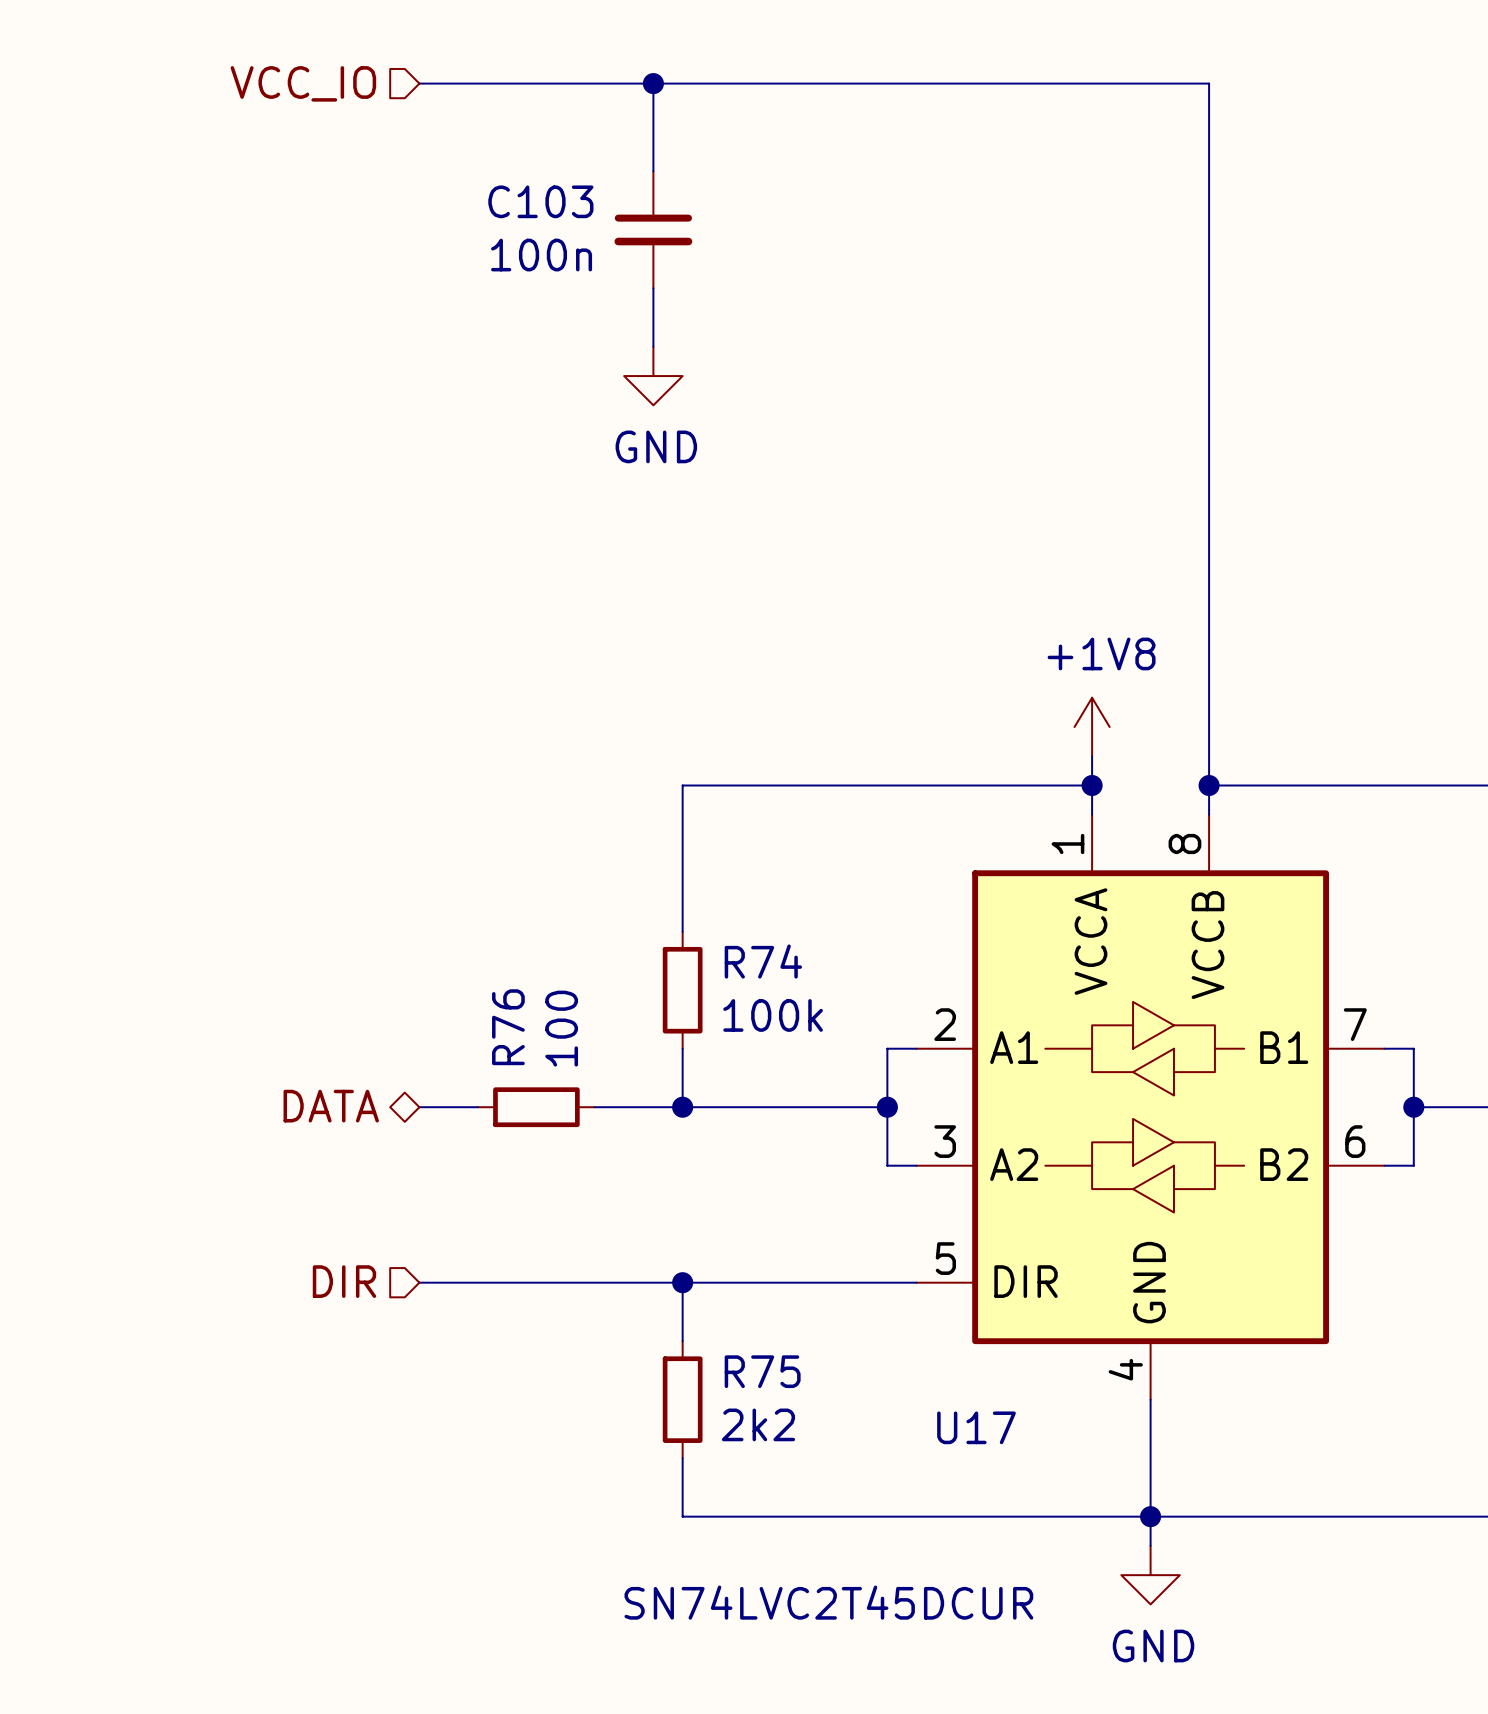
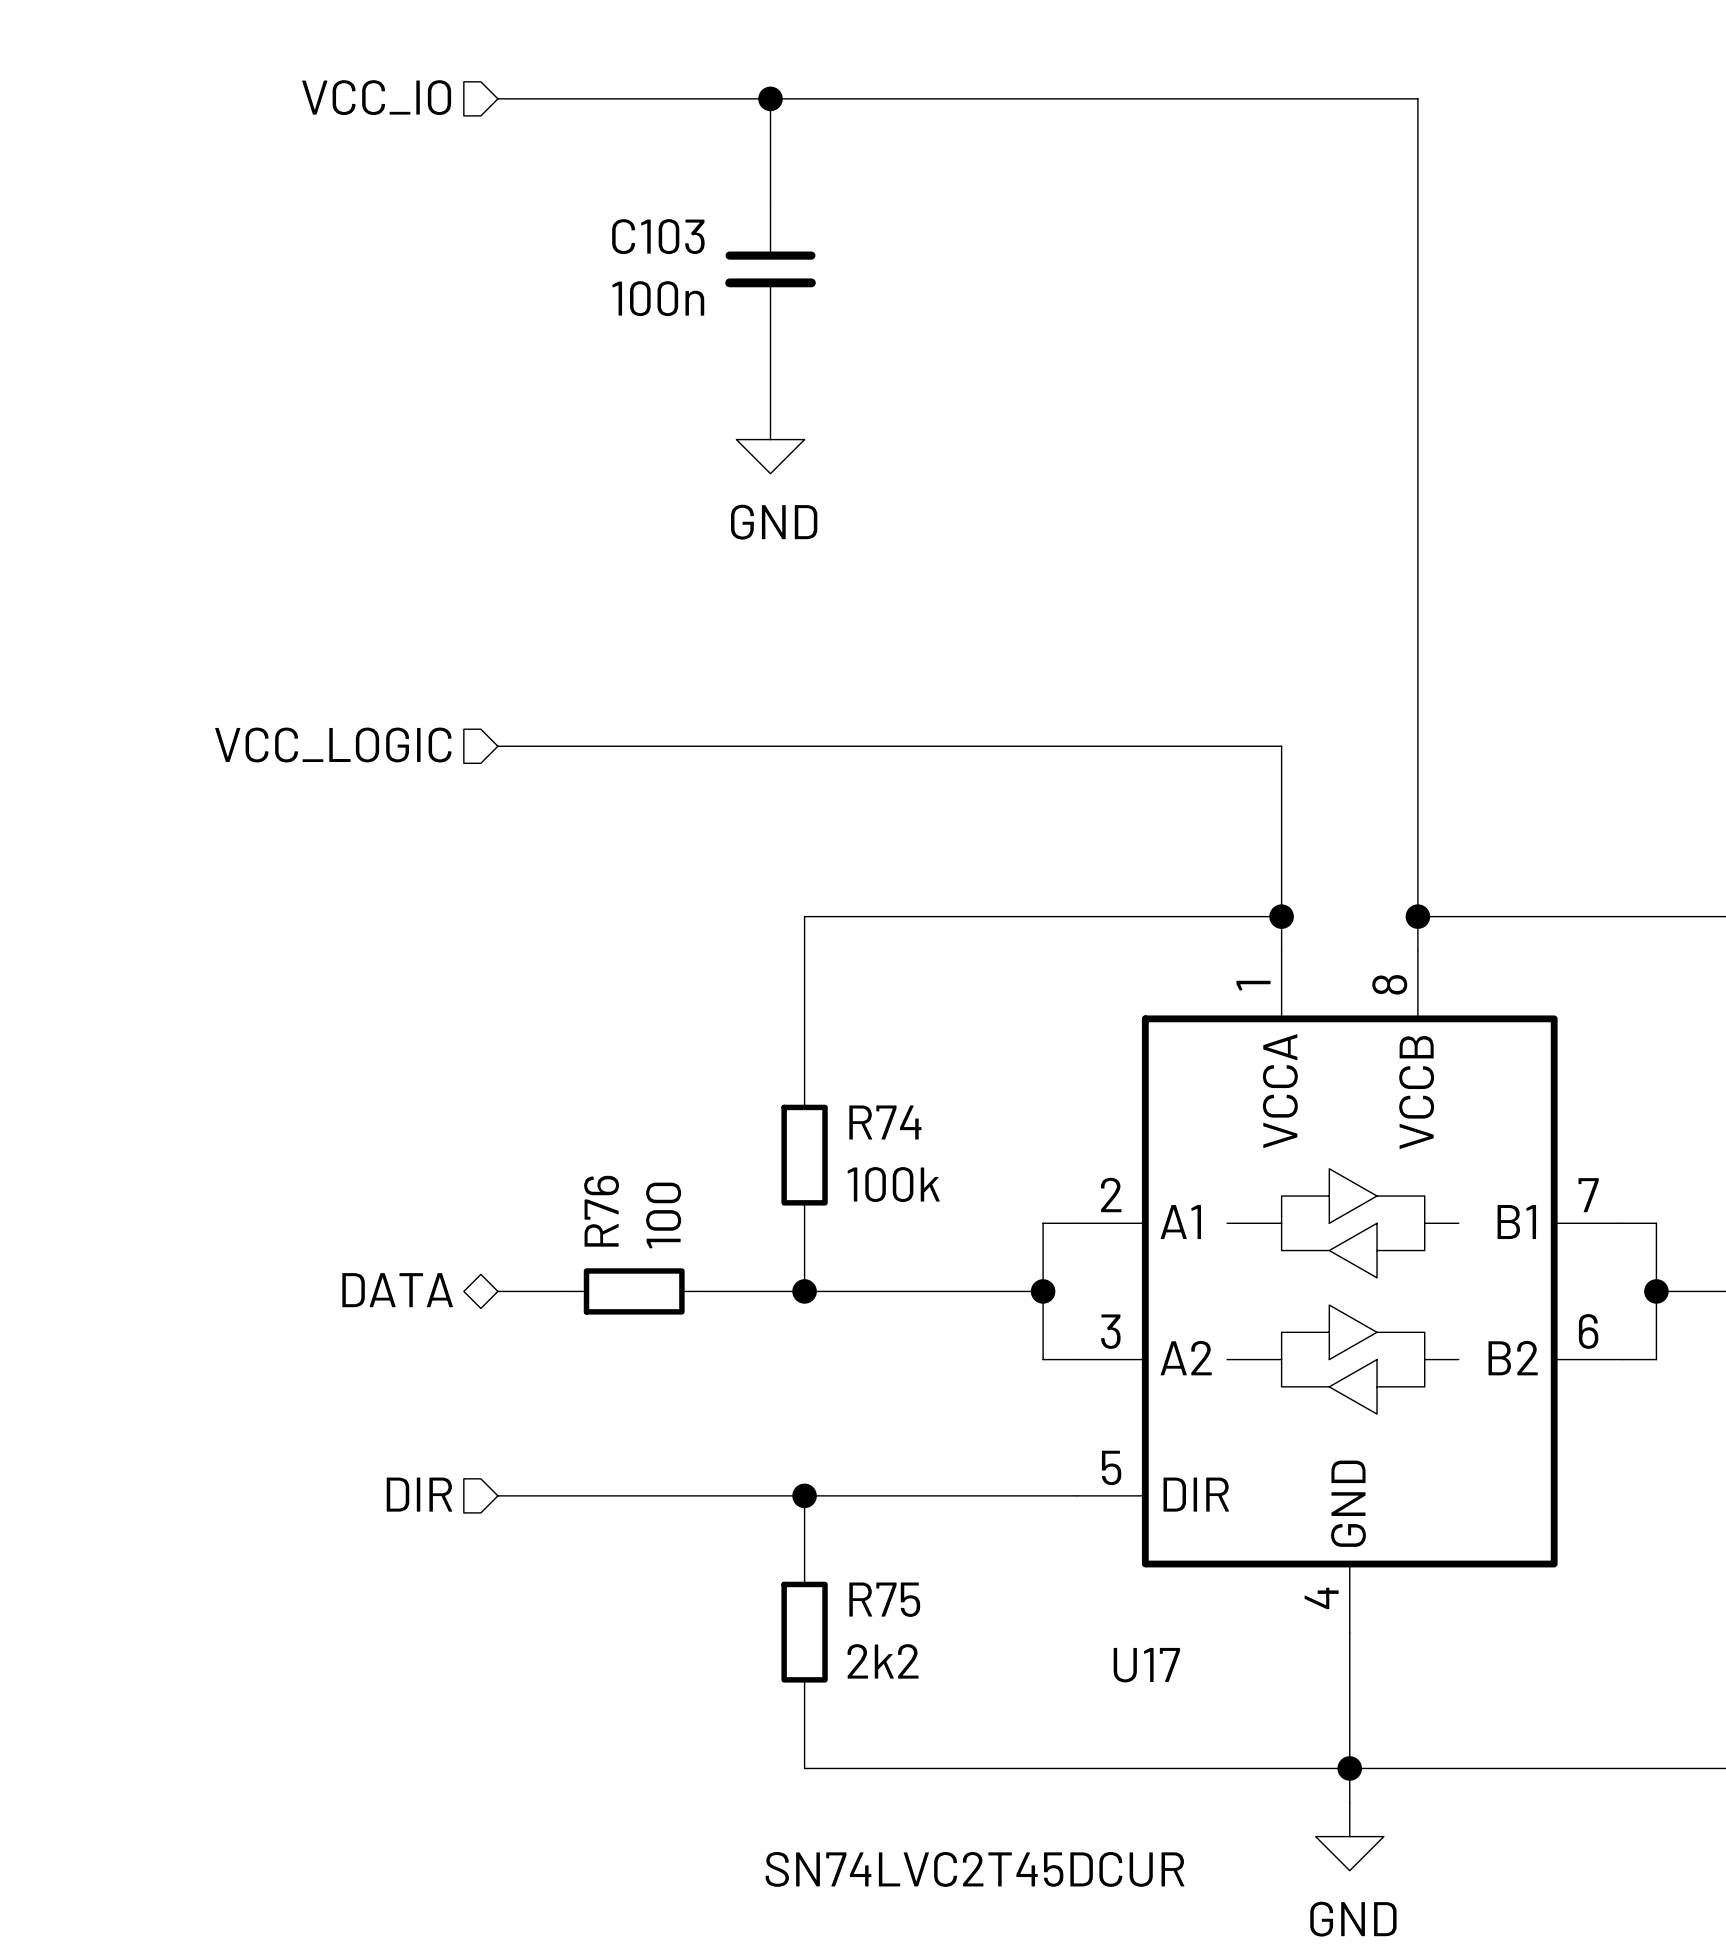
hierarchical label: none -> VCC_LOGIC (333, 745)
wire: none -> (497, 746) (1281, 746) (1281, 882)
power symbol: +1V8 (1092, 727) -> none

